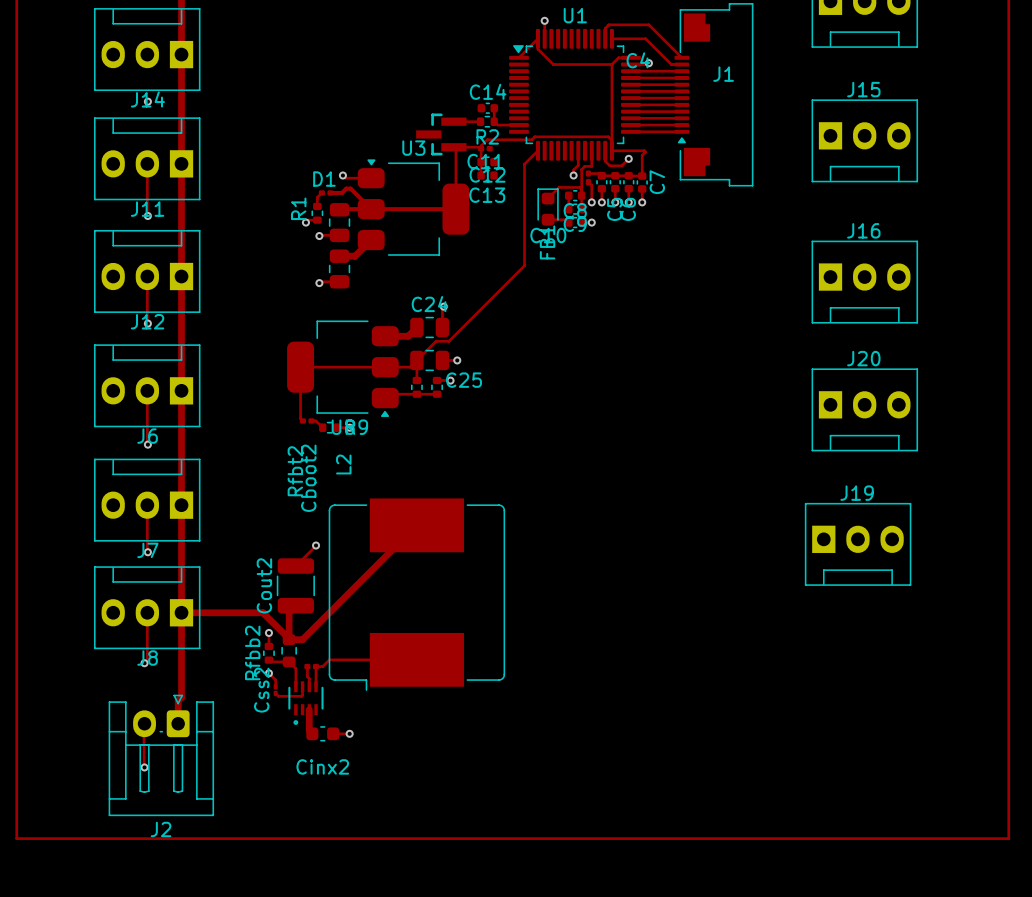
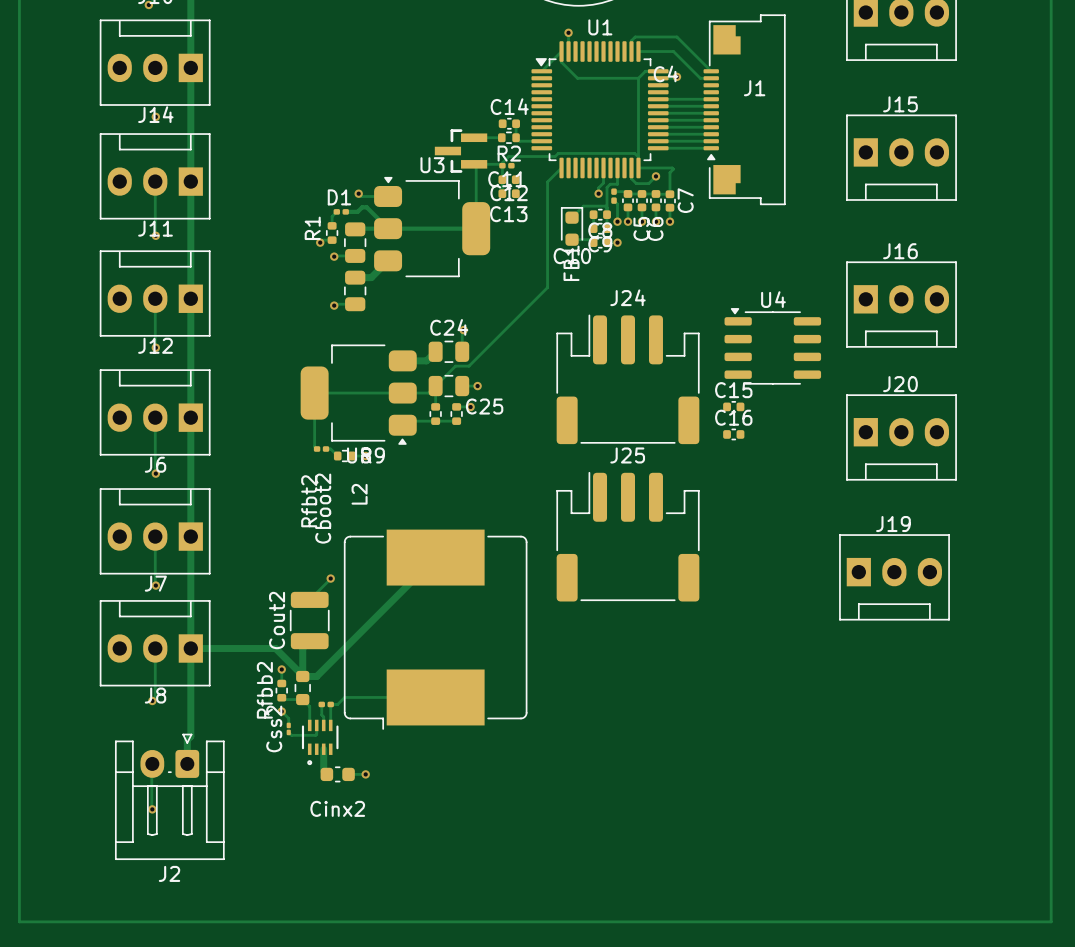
track: (630, 71) (681, 71) -> none
track: (630, 77) (681, 77) -> none
U4: none -> (772, 346)
J24: none -> (628, 379)
C15: none -> (733, 406)
C16: none -> (733, 434)
J25: none -> (628, 536)
track: (16, 838) (1008, 838) -> (19, 883) (19, 921) (1051, 921) (1051, 883)

